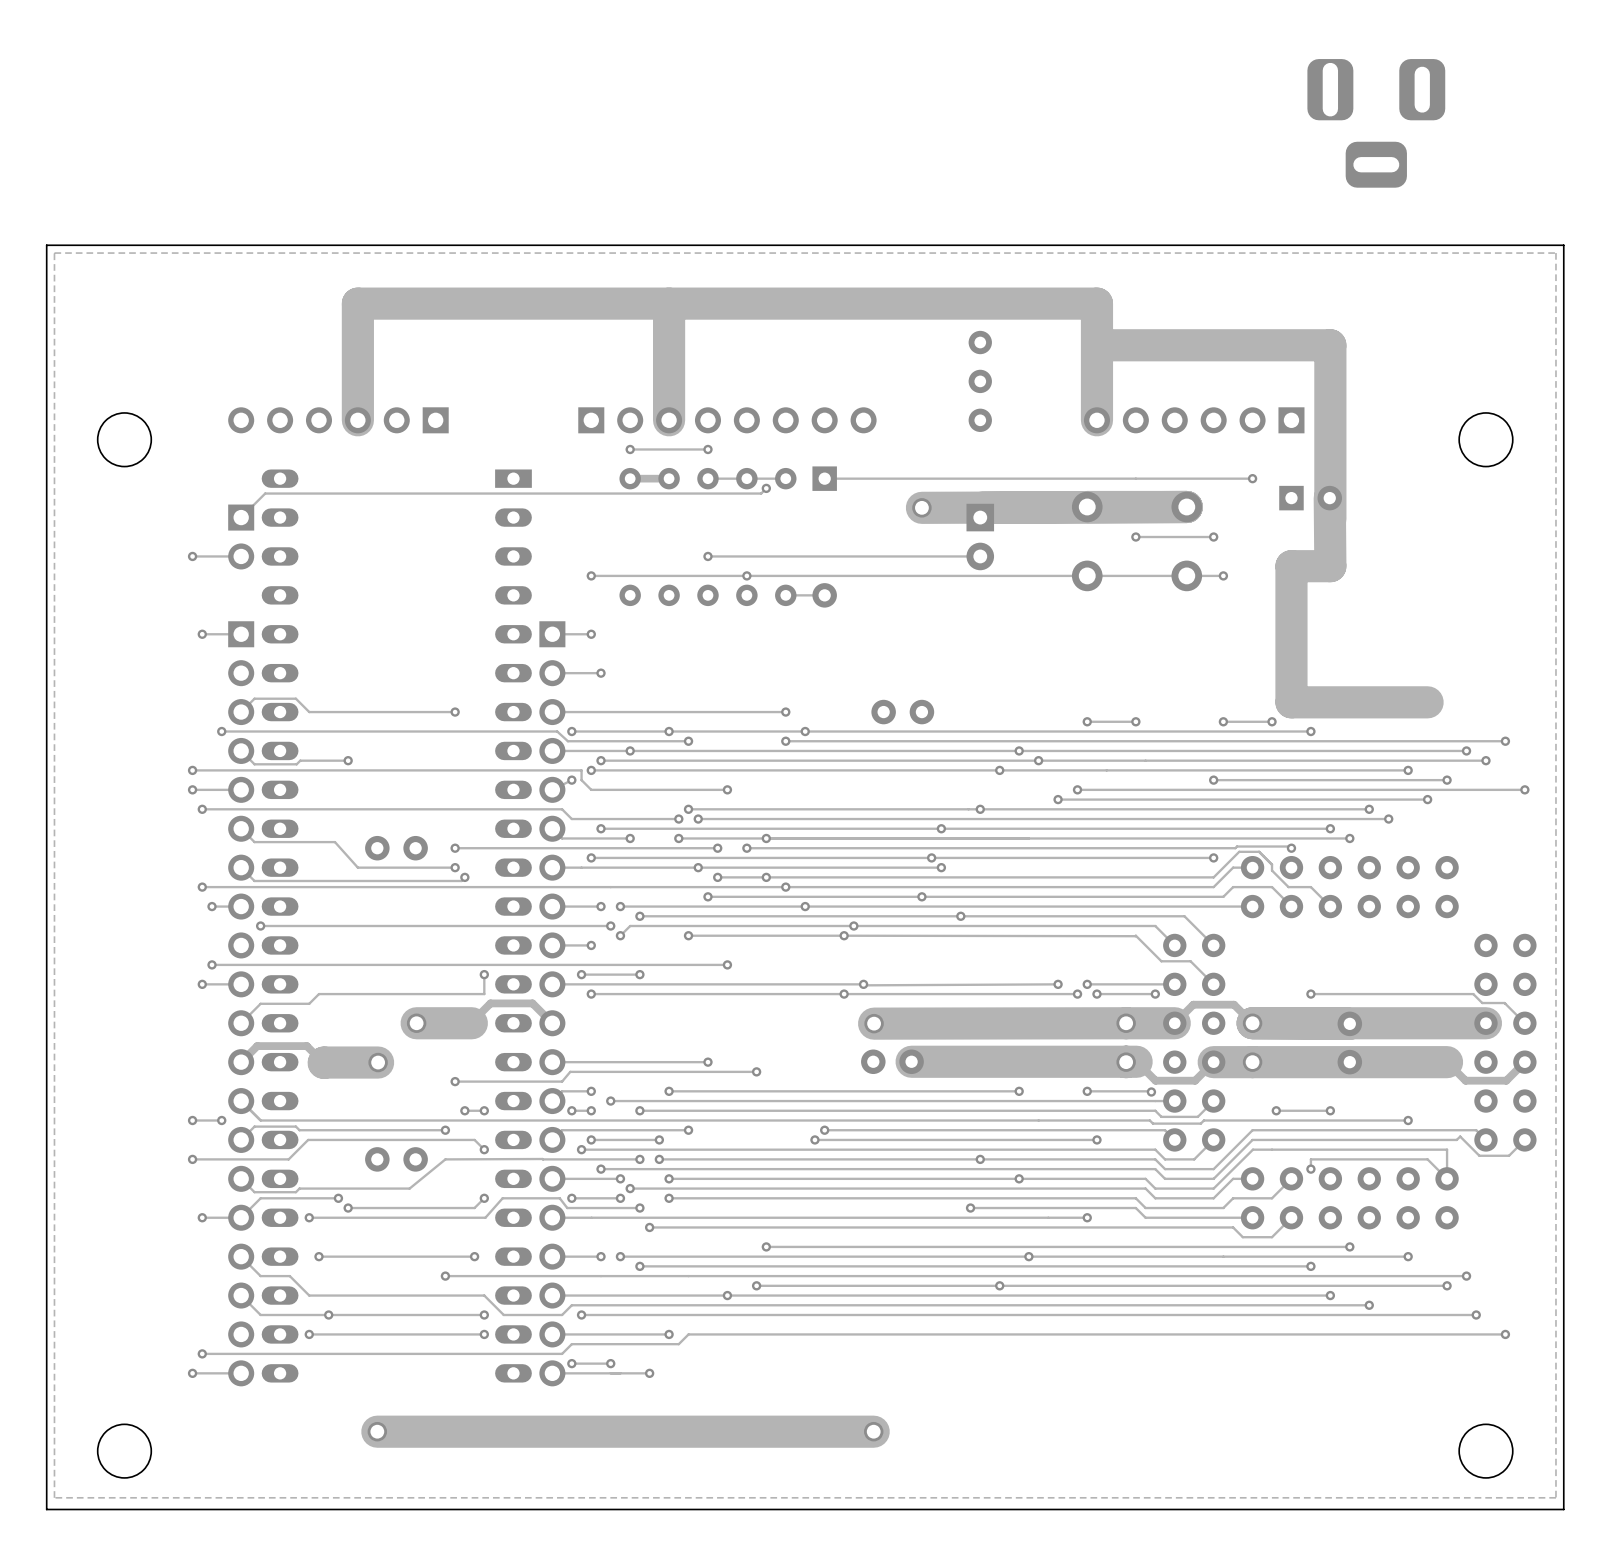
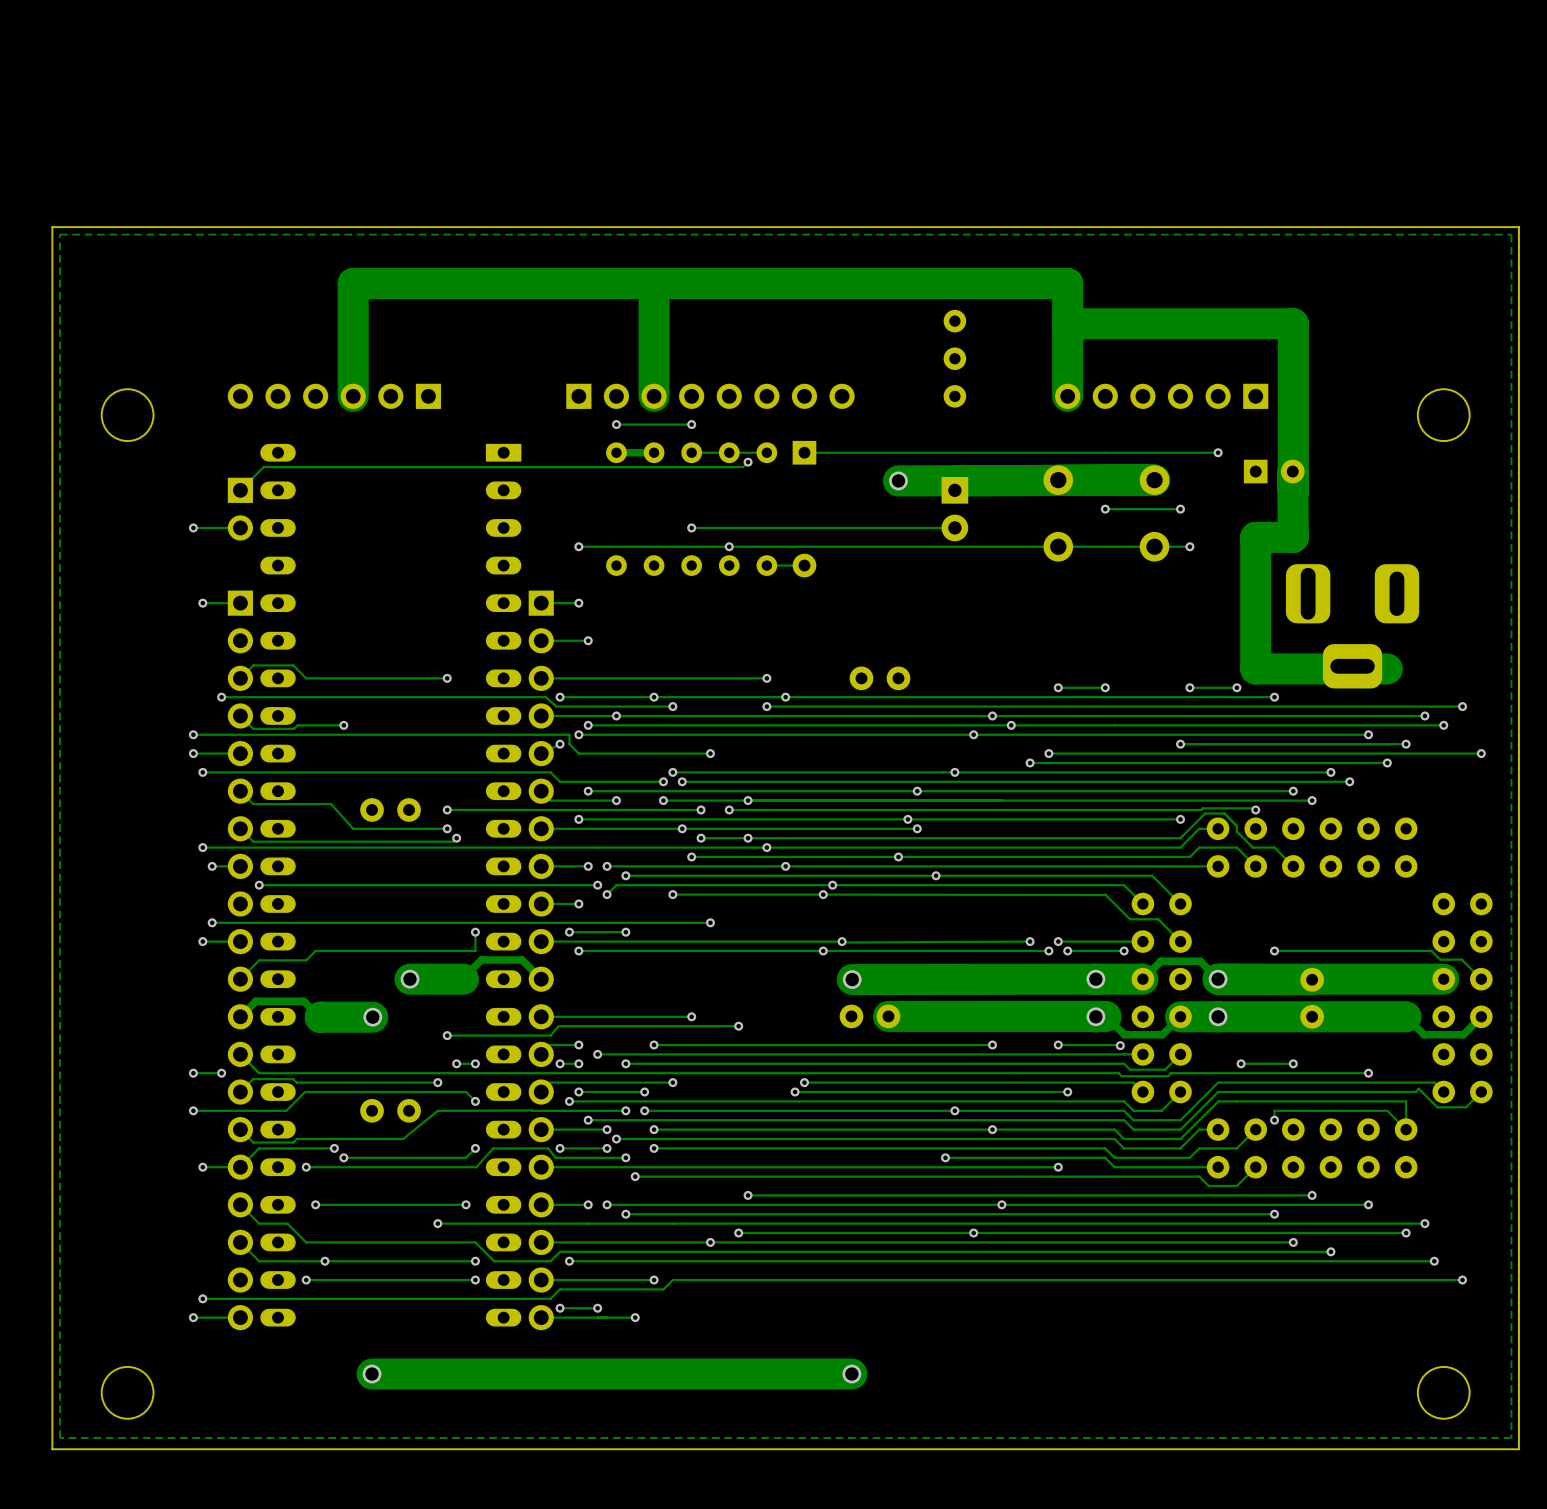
part: (1376, 123) -> none
part: none -> (1352, 626)

